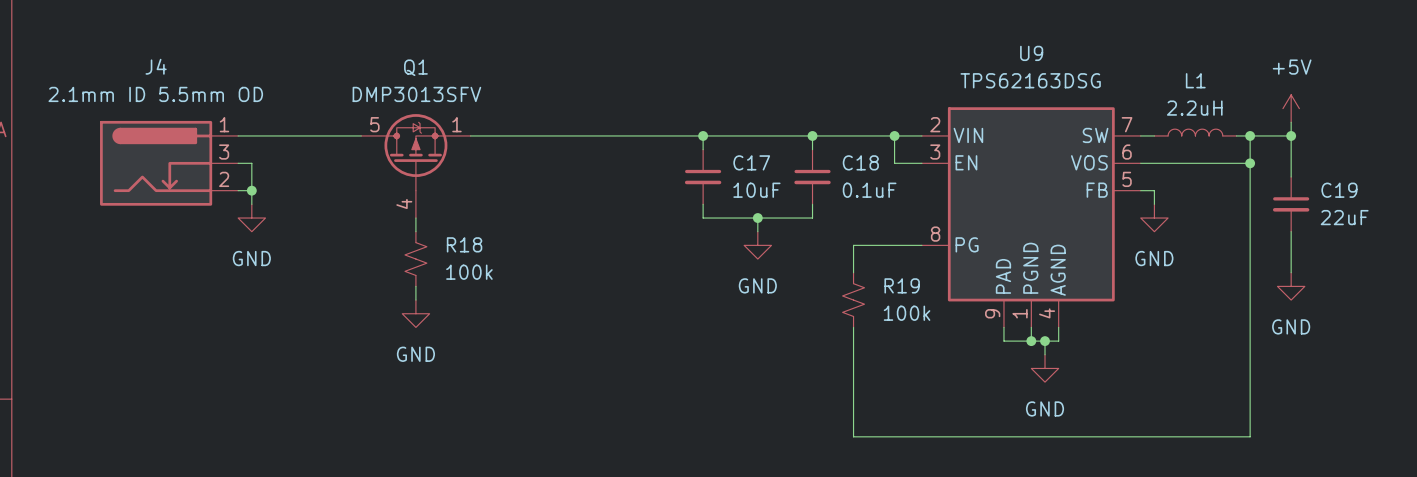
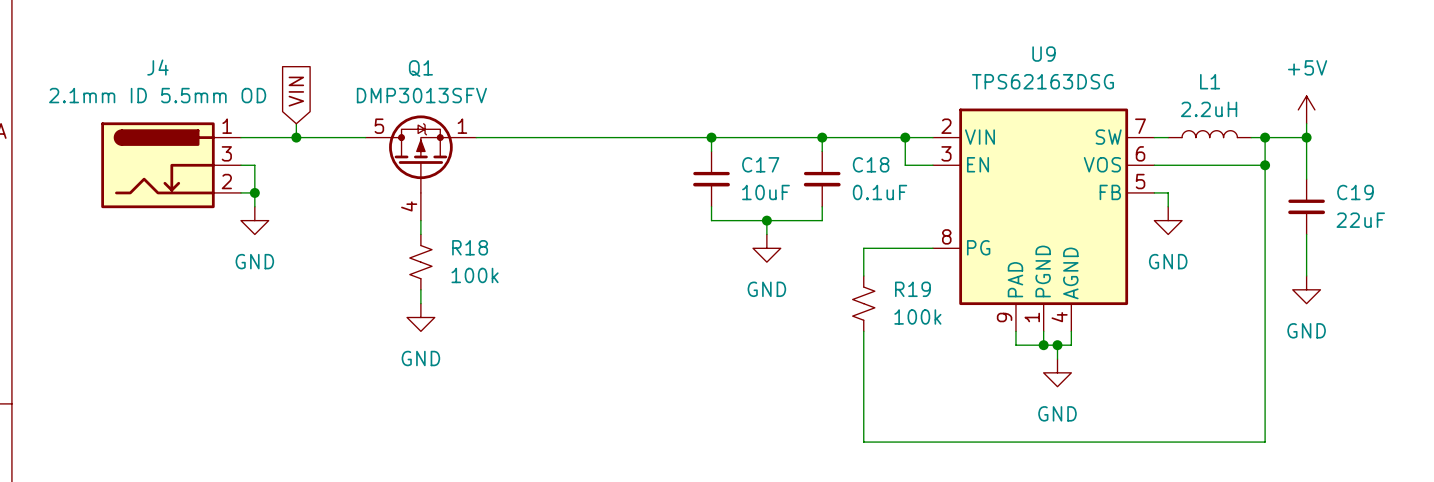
global label: none -> VIN (296, 91)
wire: none -> (296, 123) (296, 137)
junction: none -> (296, 137)

